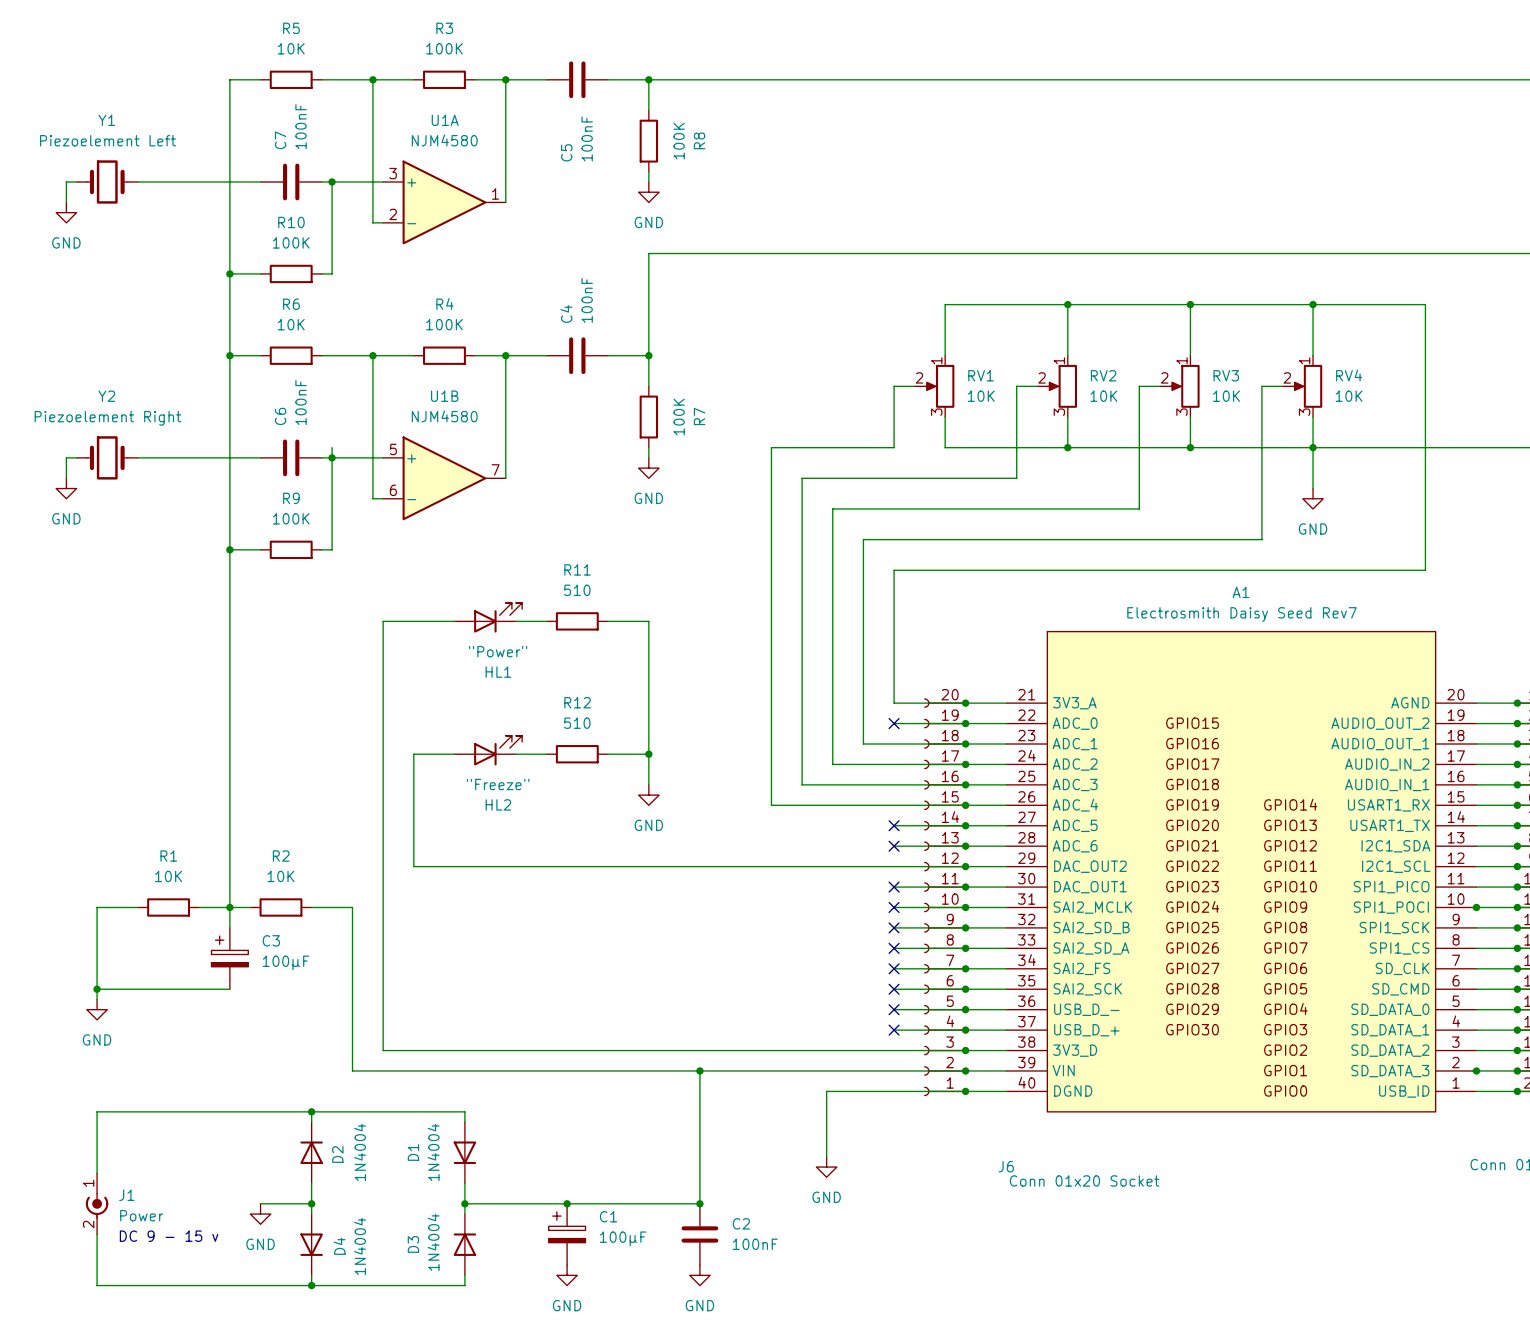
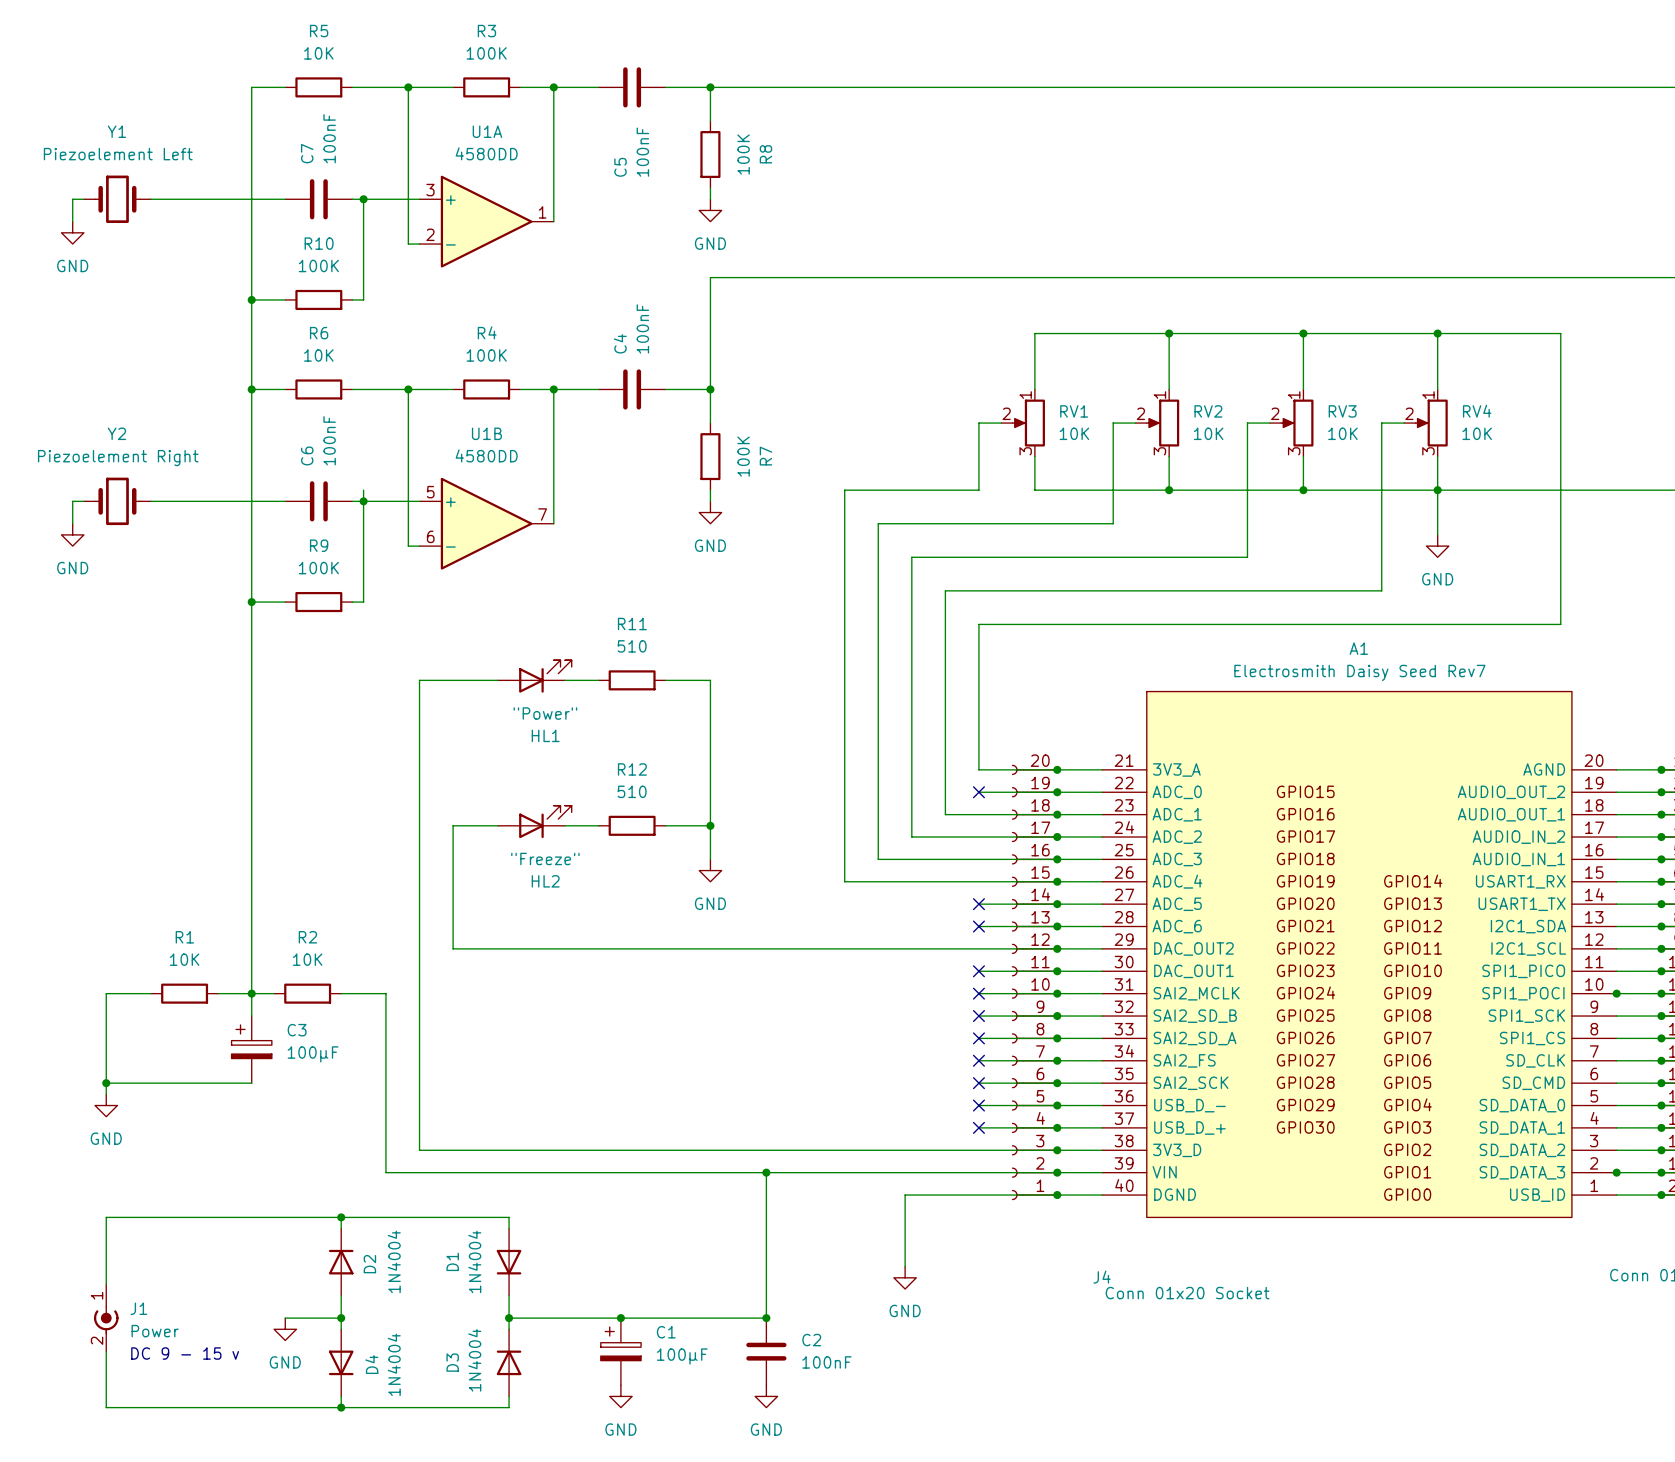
U1A value: NJM4580 (444, 140) -> 4580DD (486, 153)
U1B value: NJM4580 (444, 416) -> 4580DD (486, 455)
J6 name: J6 (1006, 1166) -> J4 (1102, 1277)

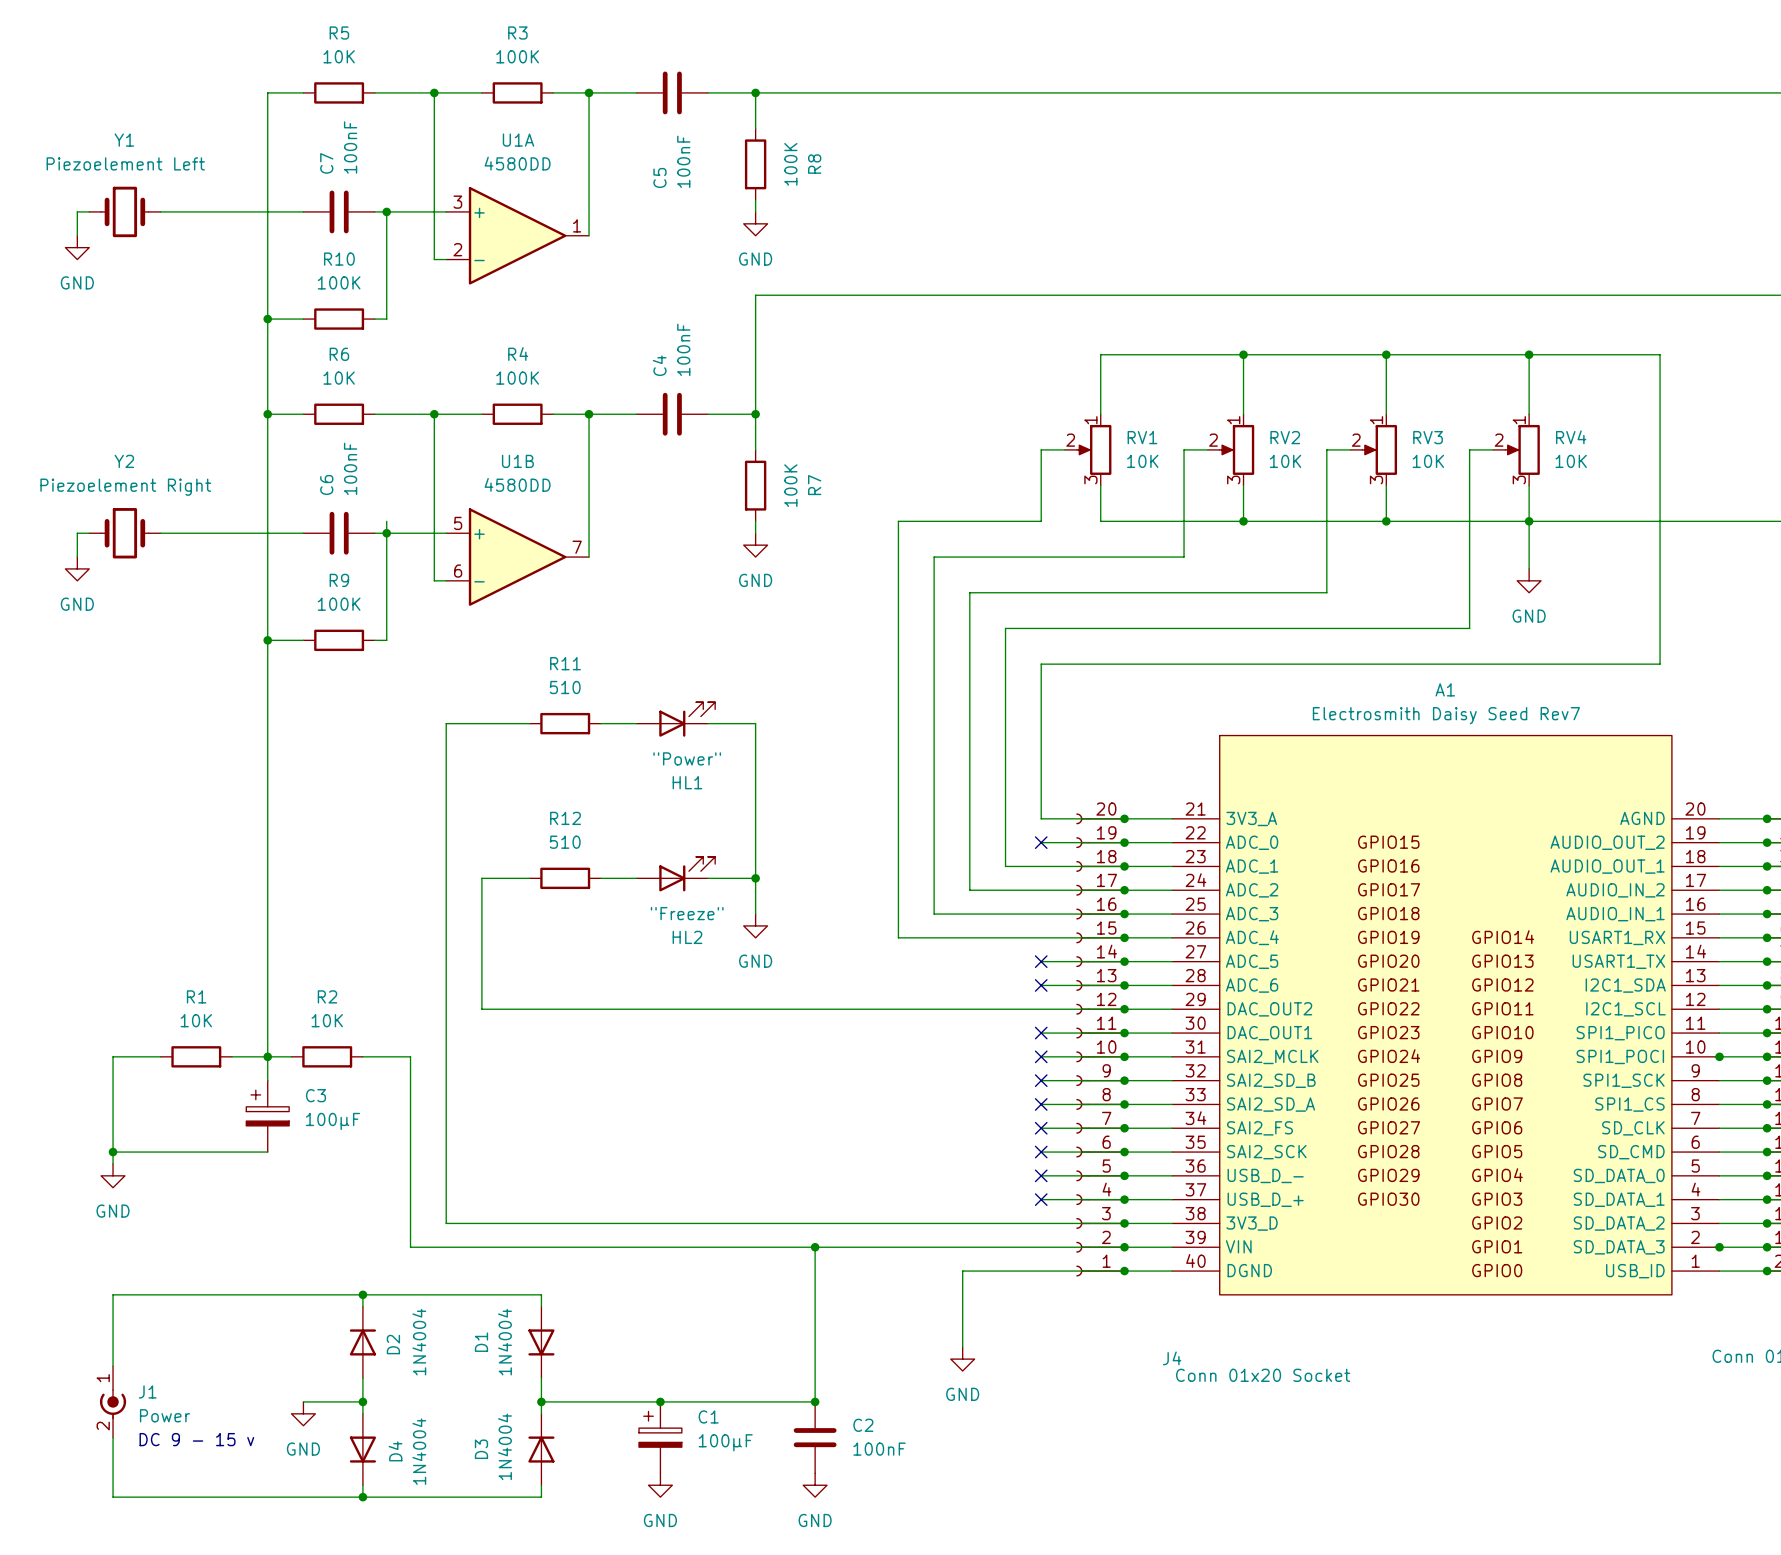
HL1 position: (534, 676) -> (675, 719)
R11 position: (632, 680) -> (565, 723)
HL2 position: (534, 821) -> (675, 874)
R12 position: (632, 825) -> (565, 878)

